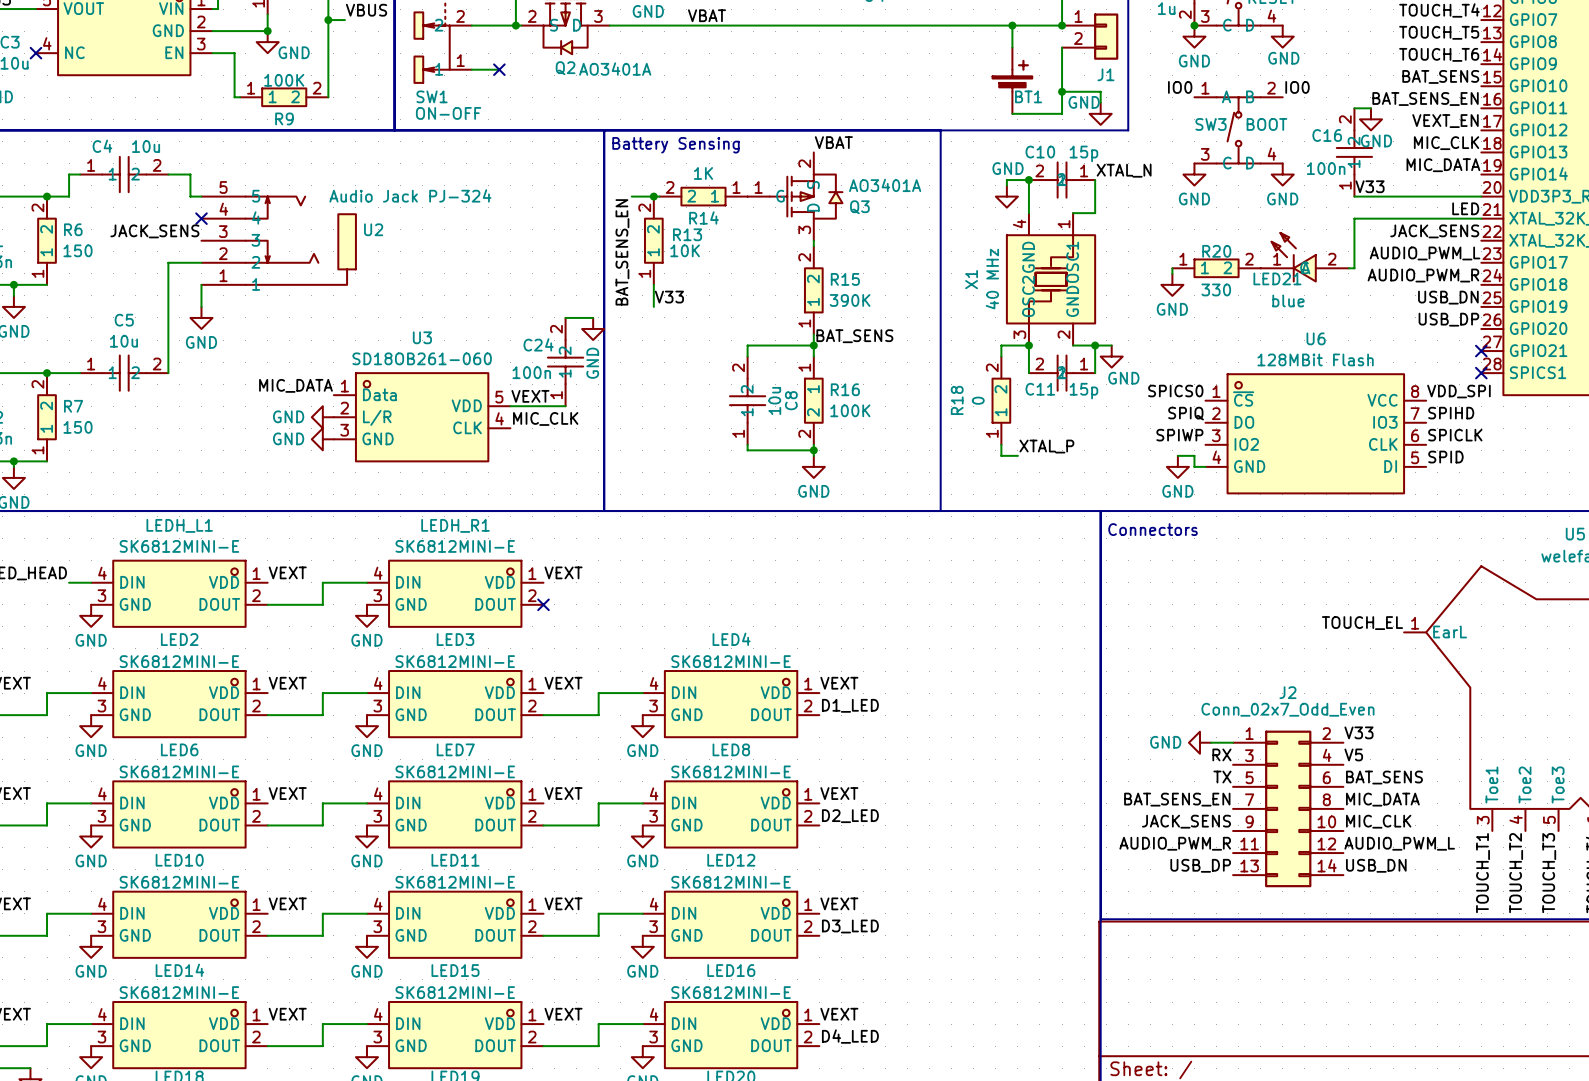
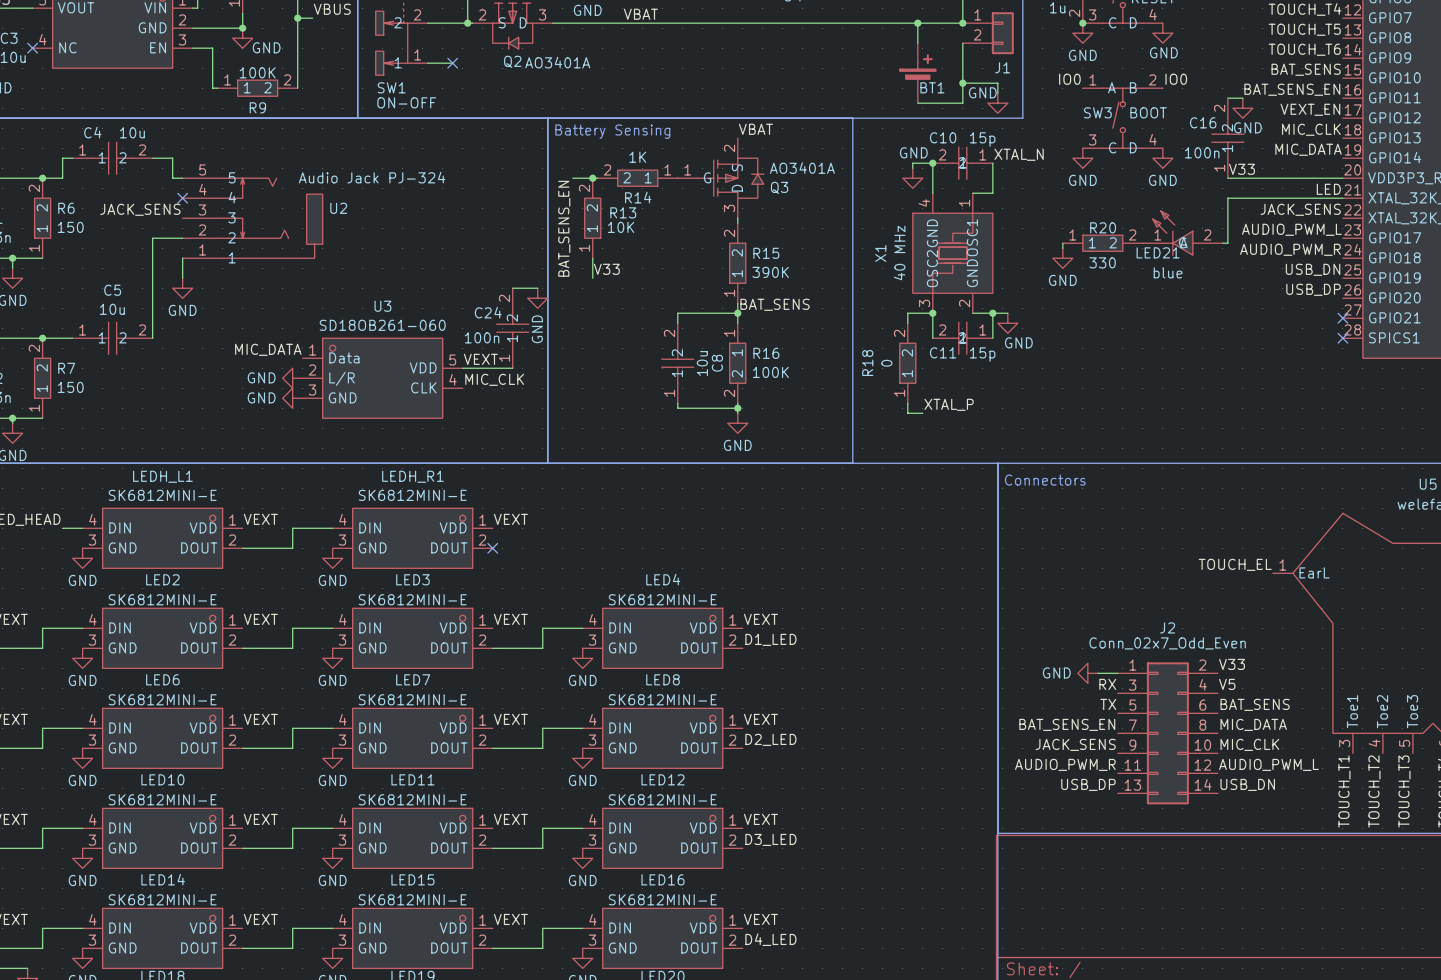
label: SPICS0 (1175, 391) -> none
label: VDD_SPI (1458, 391) -> none
label: SPIQ (1186, 413) -> none
label: SPIHD (1451, 413) -> none
U6: 128MBit Flash (1315, 433) -> none
label: SPIWP (1179, 435) -> none
label: SPICLK (1455, 435) -> none
wire: (1177, 455) (1194, 455) (1194, 466) (1205, 466) -> none
label: SPID (1445, 457) -> none
power symbol: GND (1177, 466) -> none

